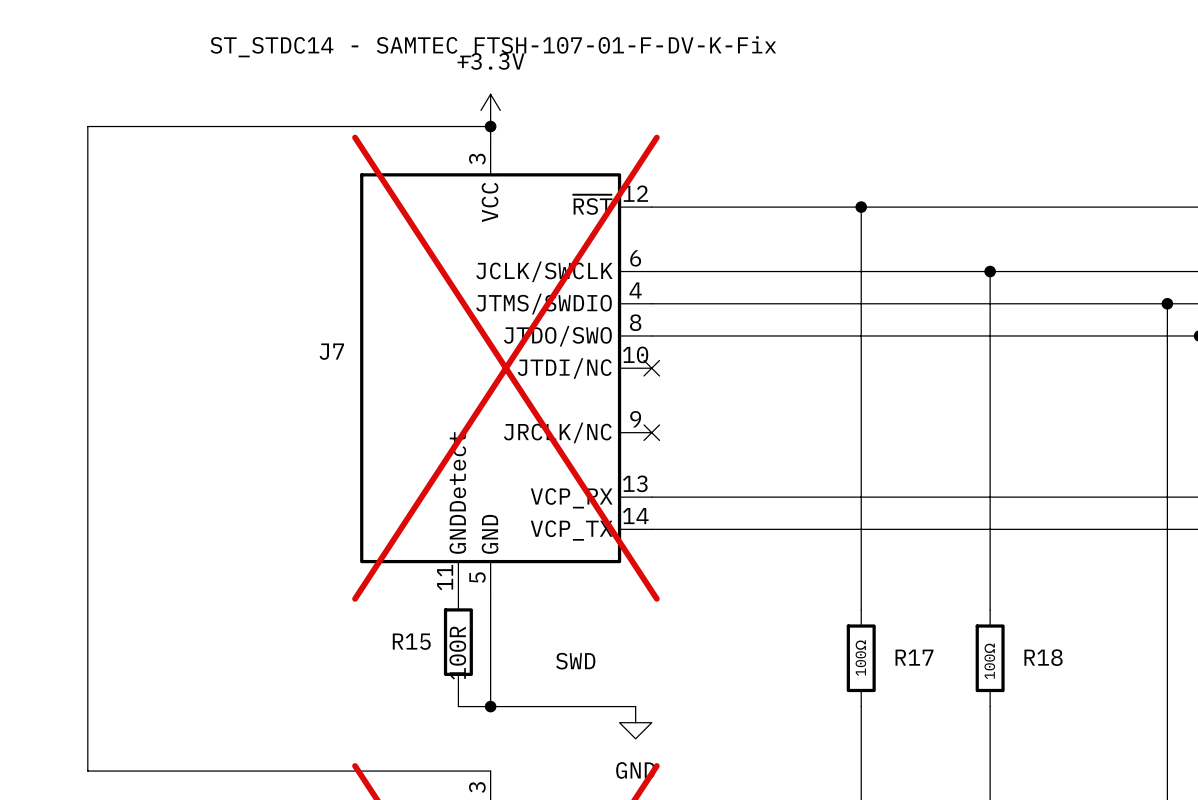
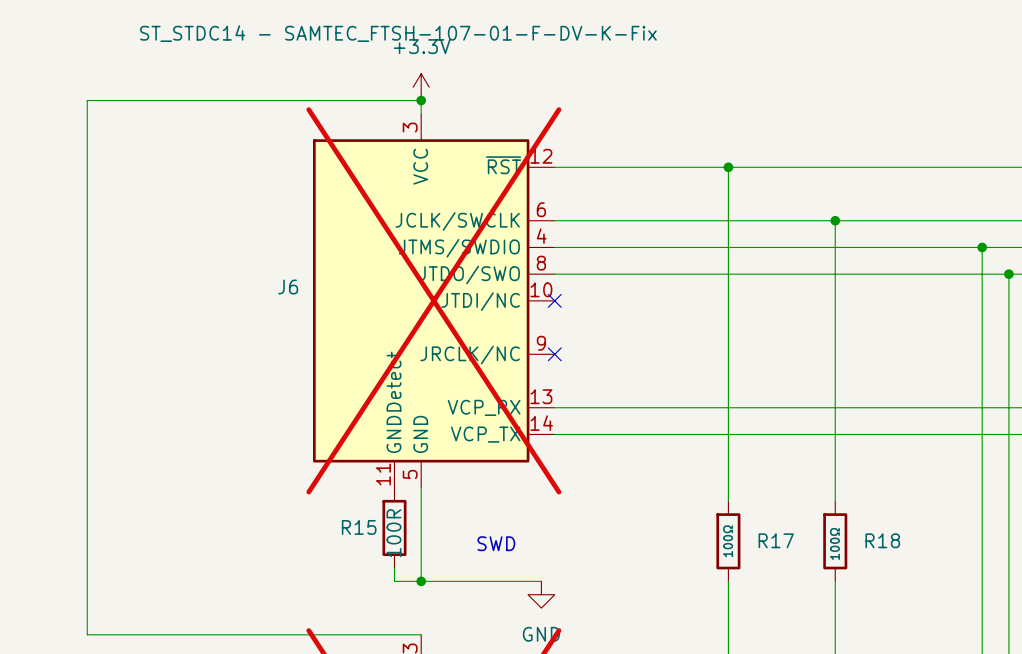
J7 name: J7 (331, 351) -> J6 (288, 287)

